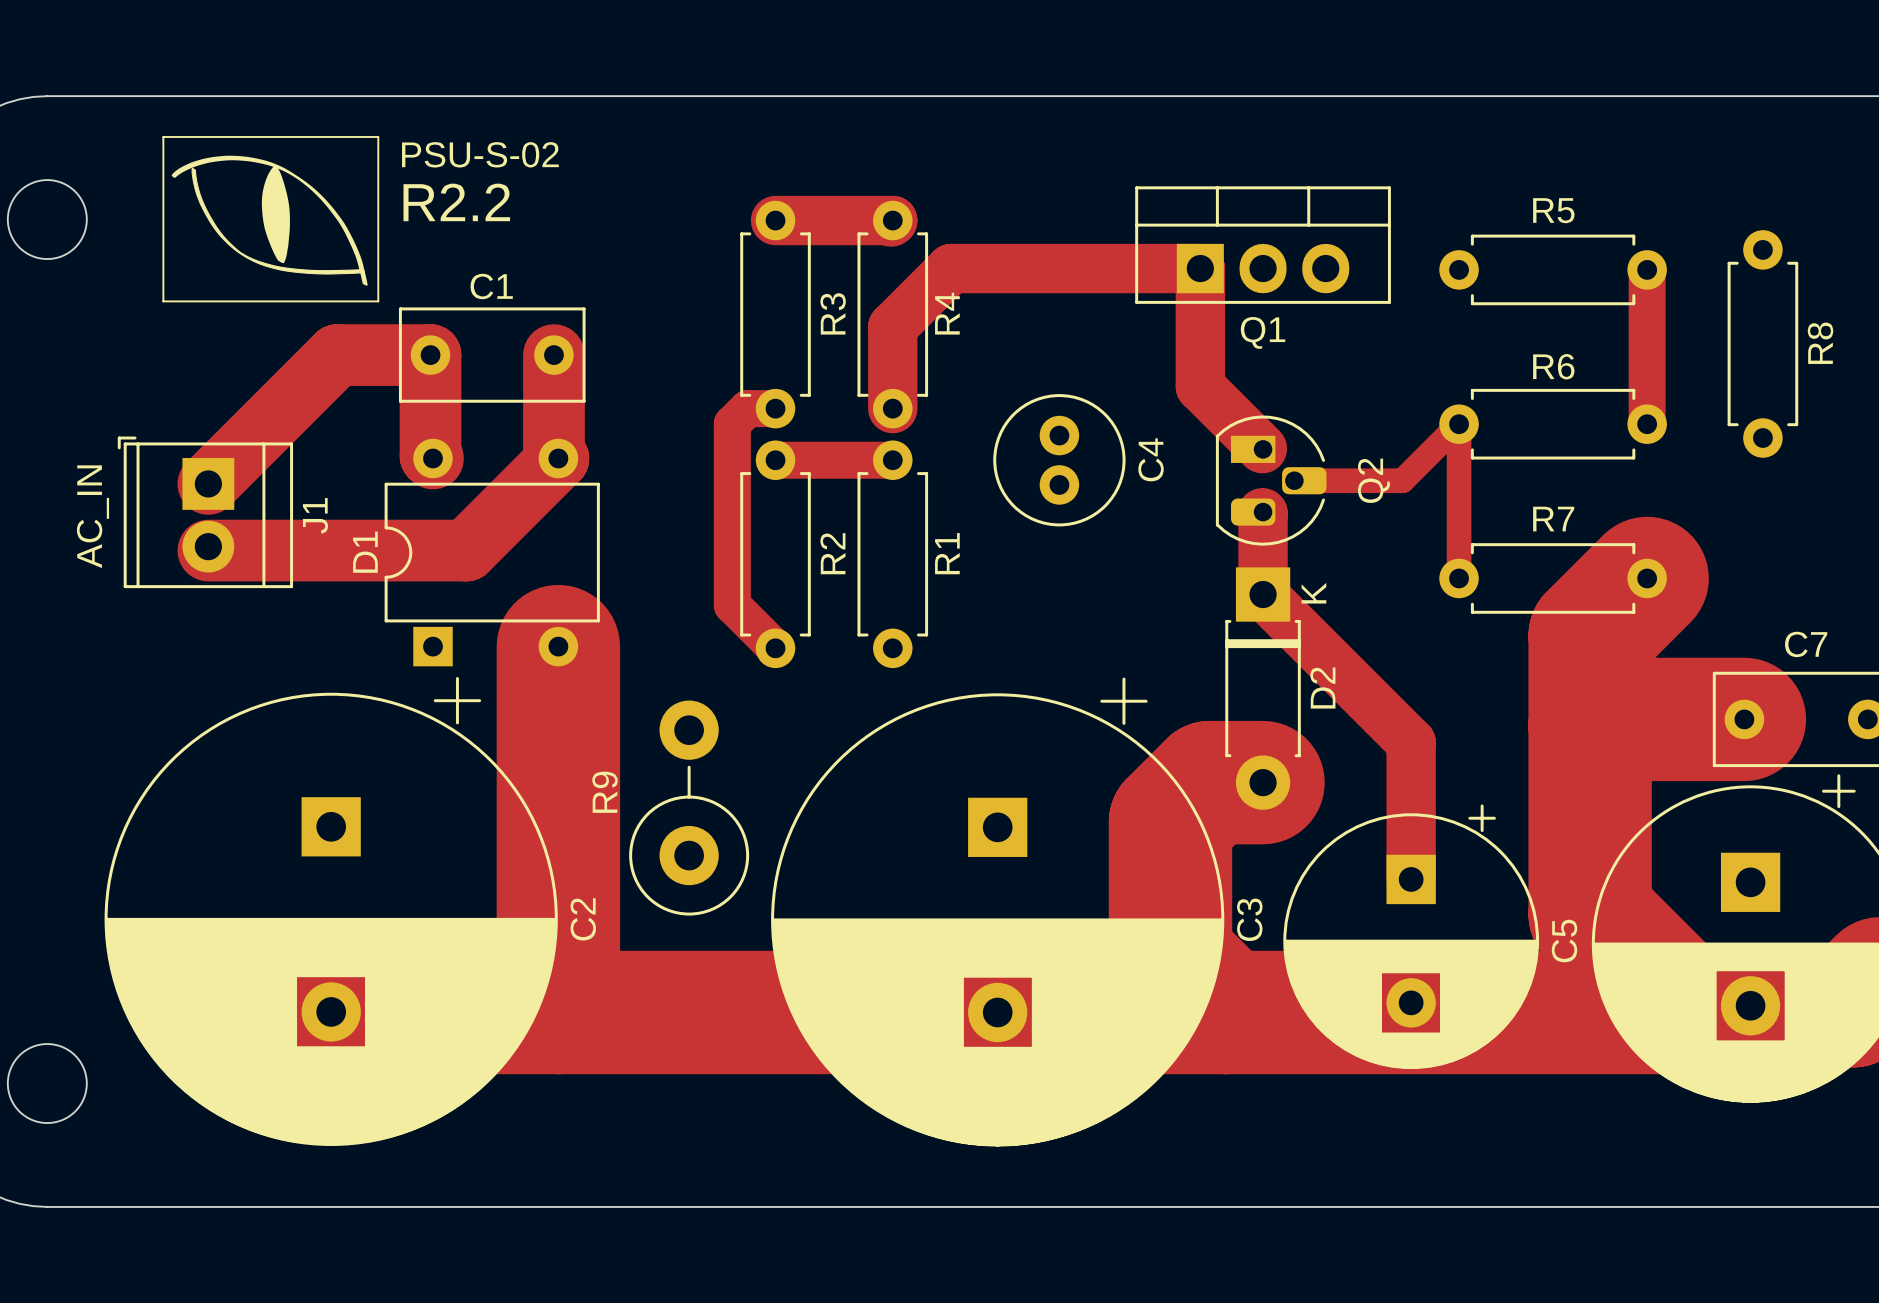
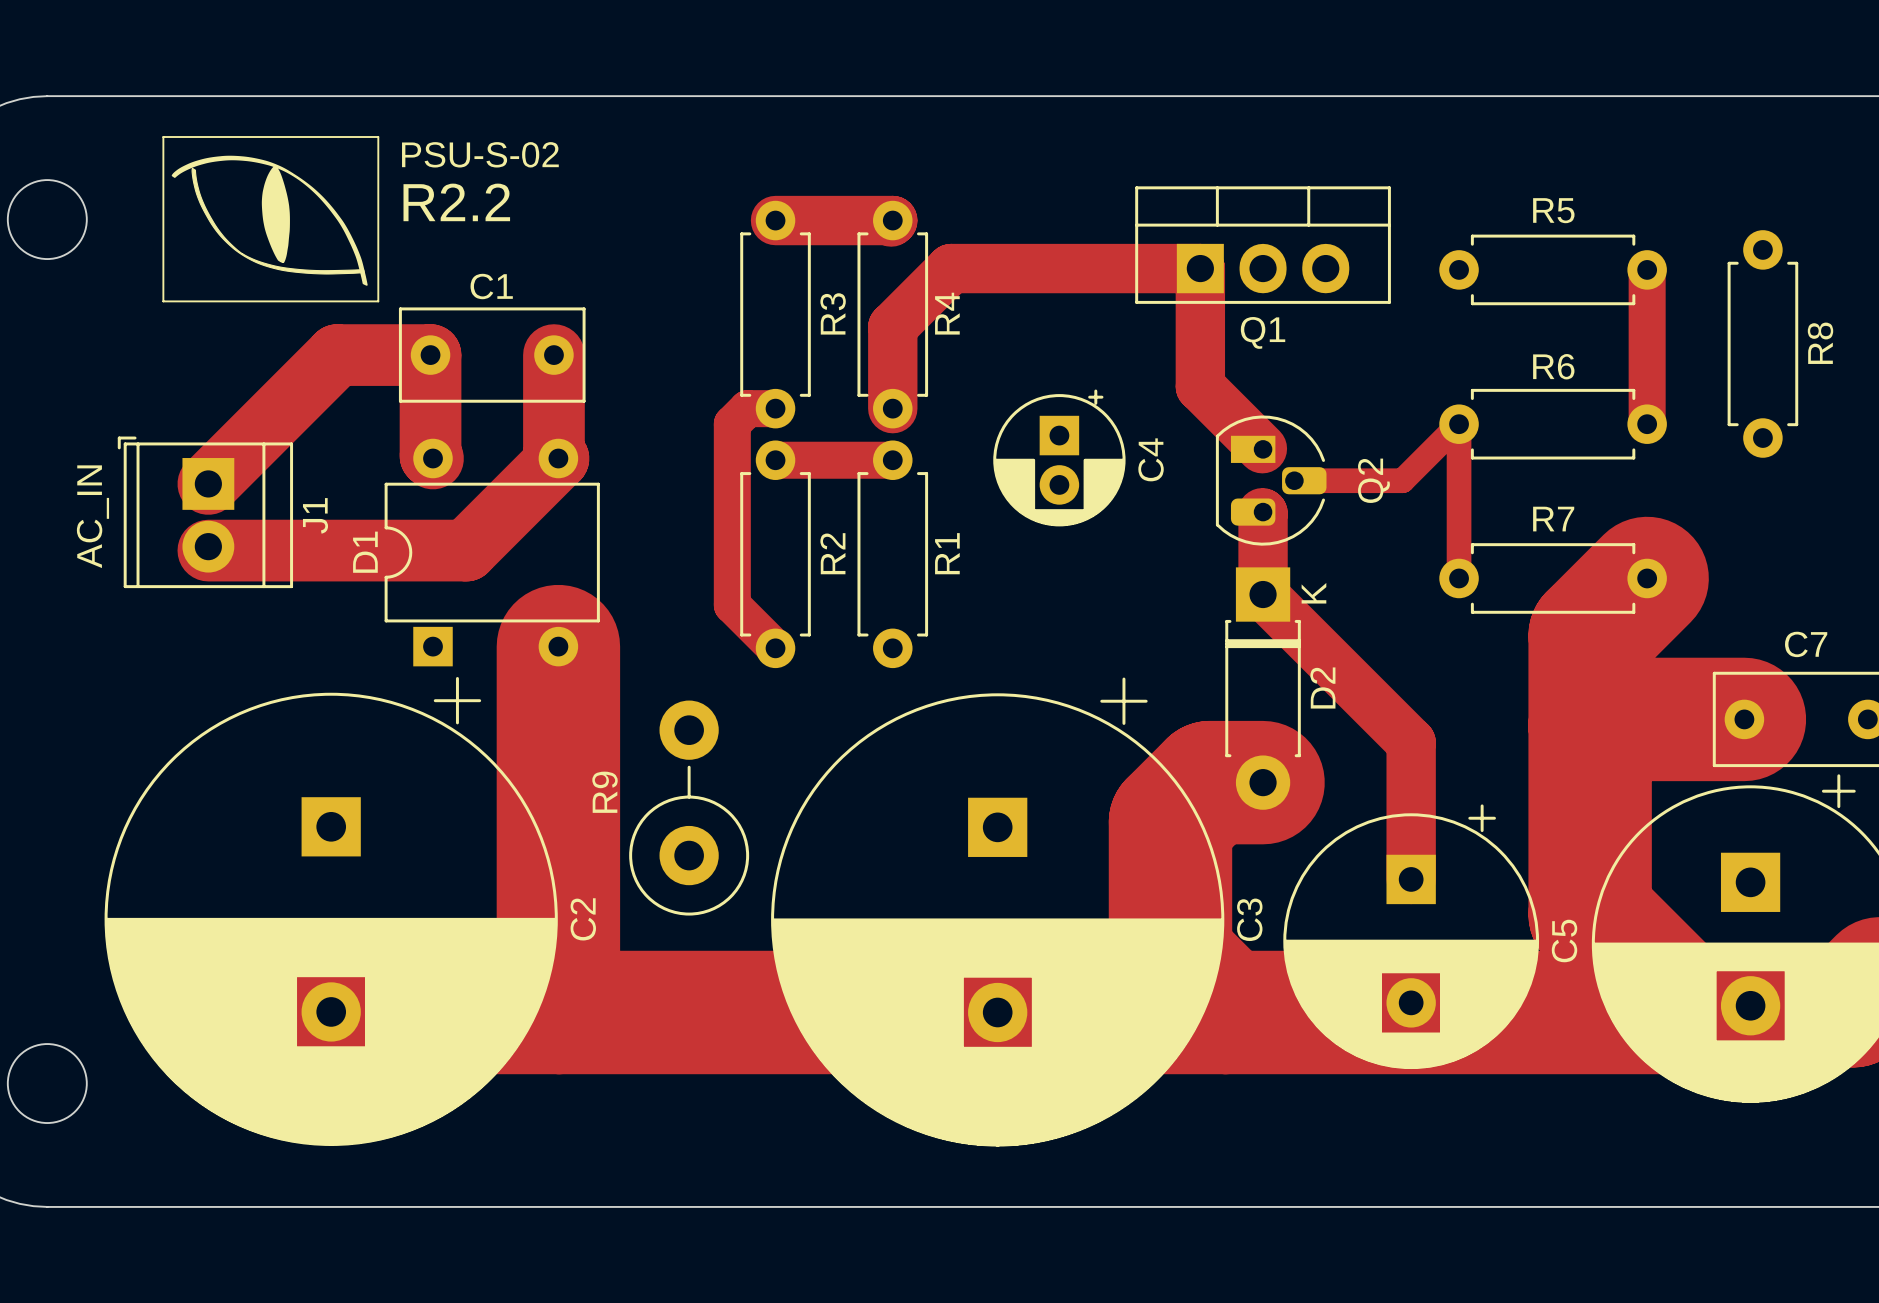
C4 footprint: [993, 394, 1126, 527] -> [993, 389, 1126, 527]

